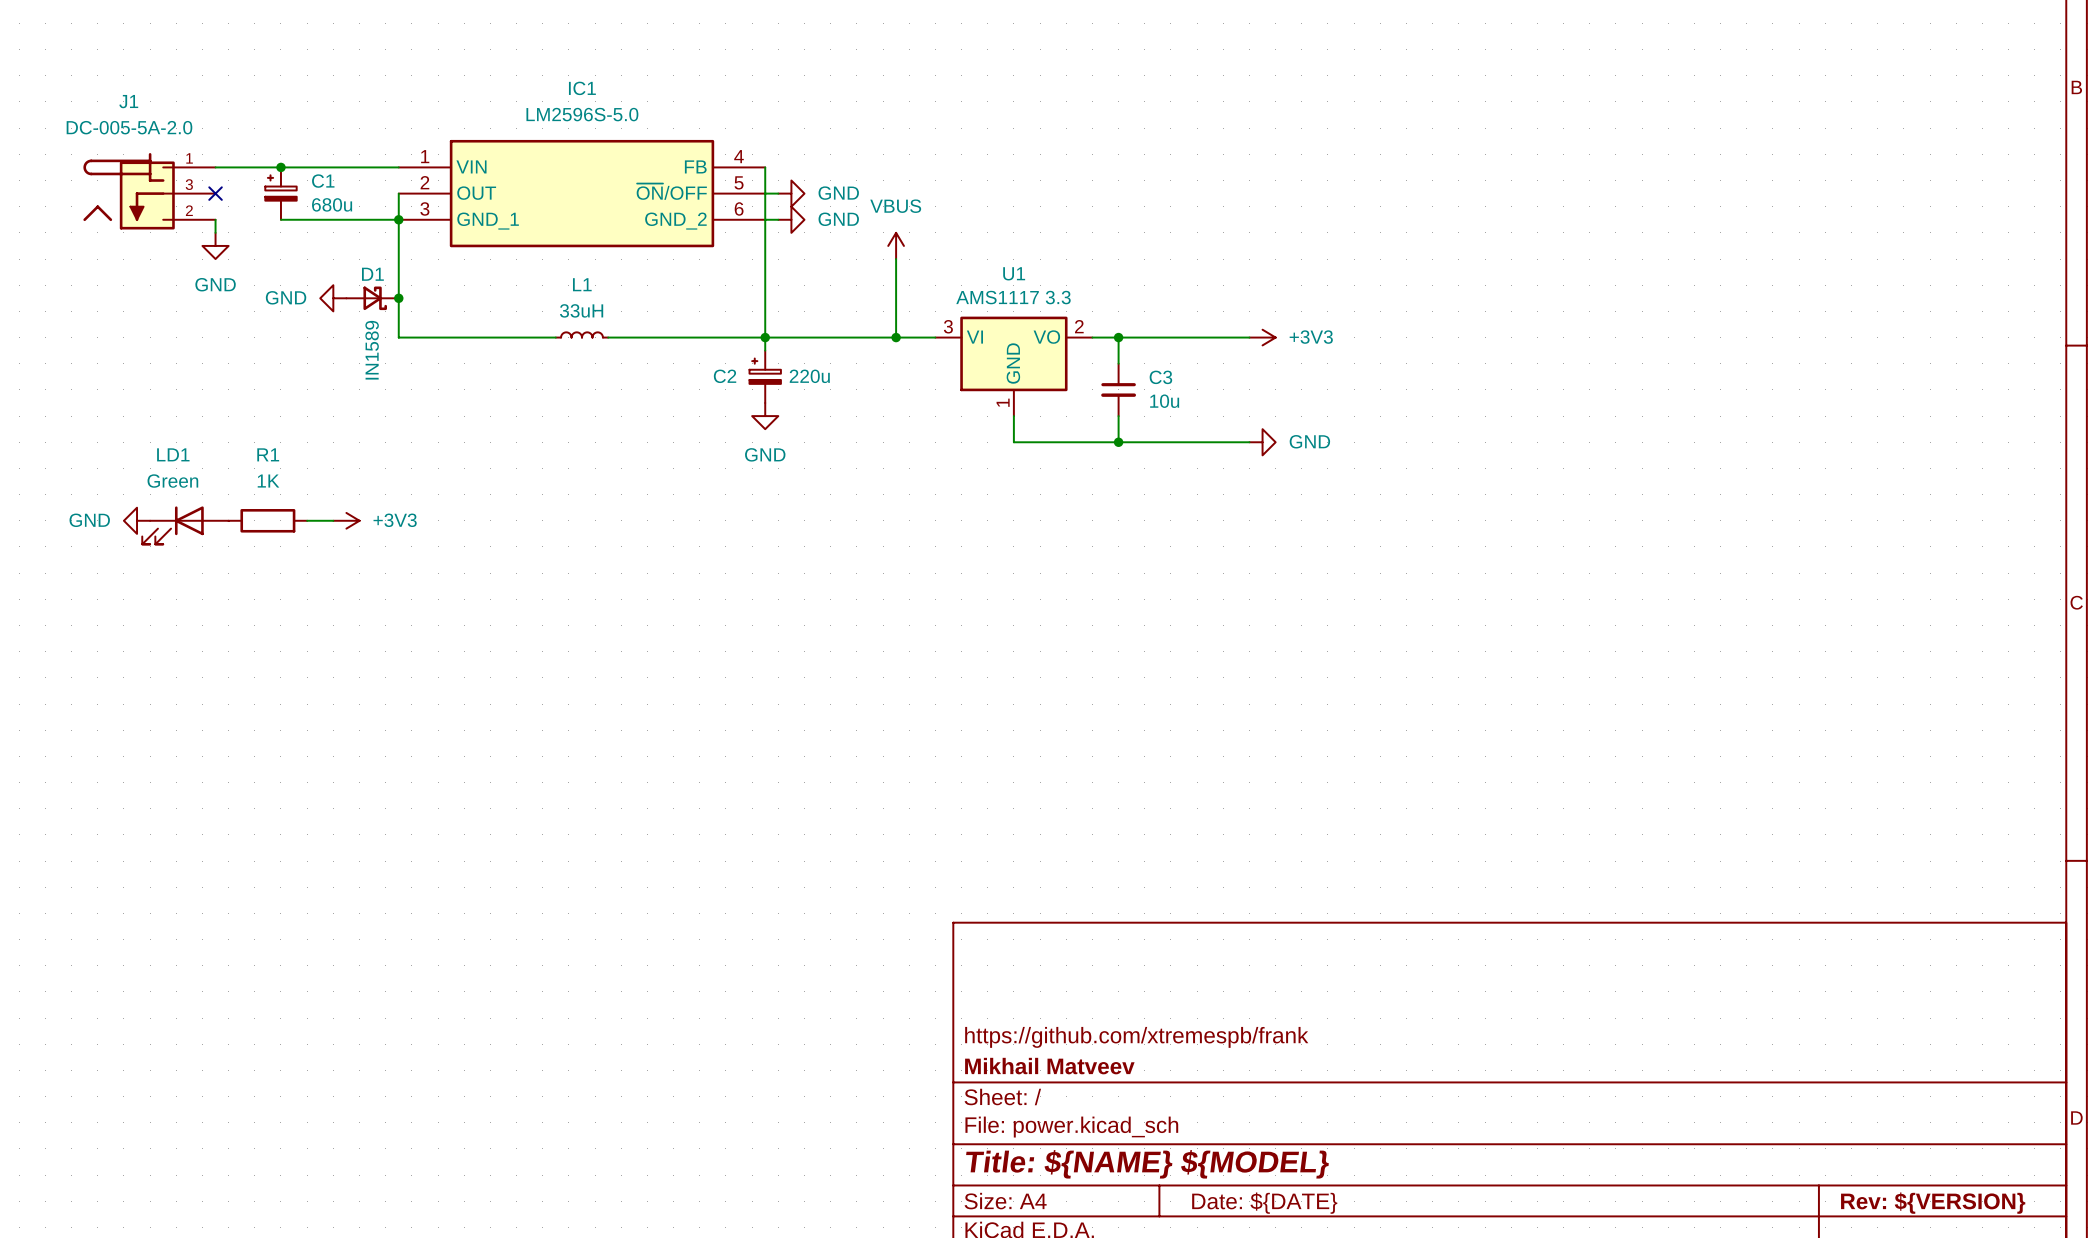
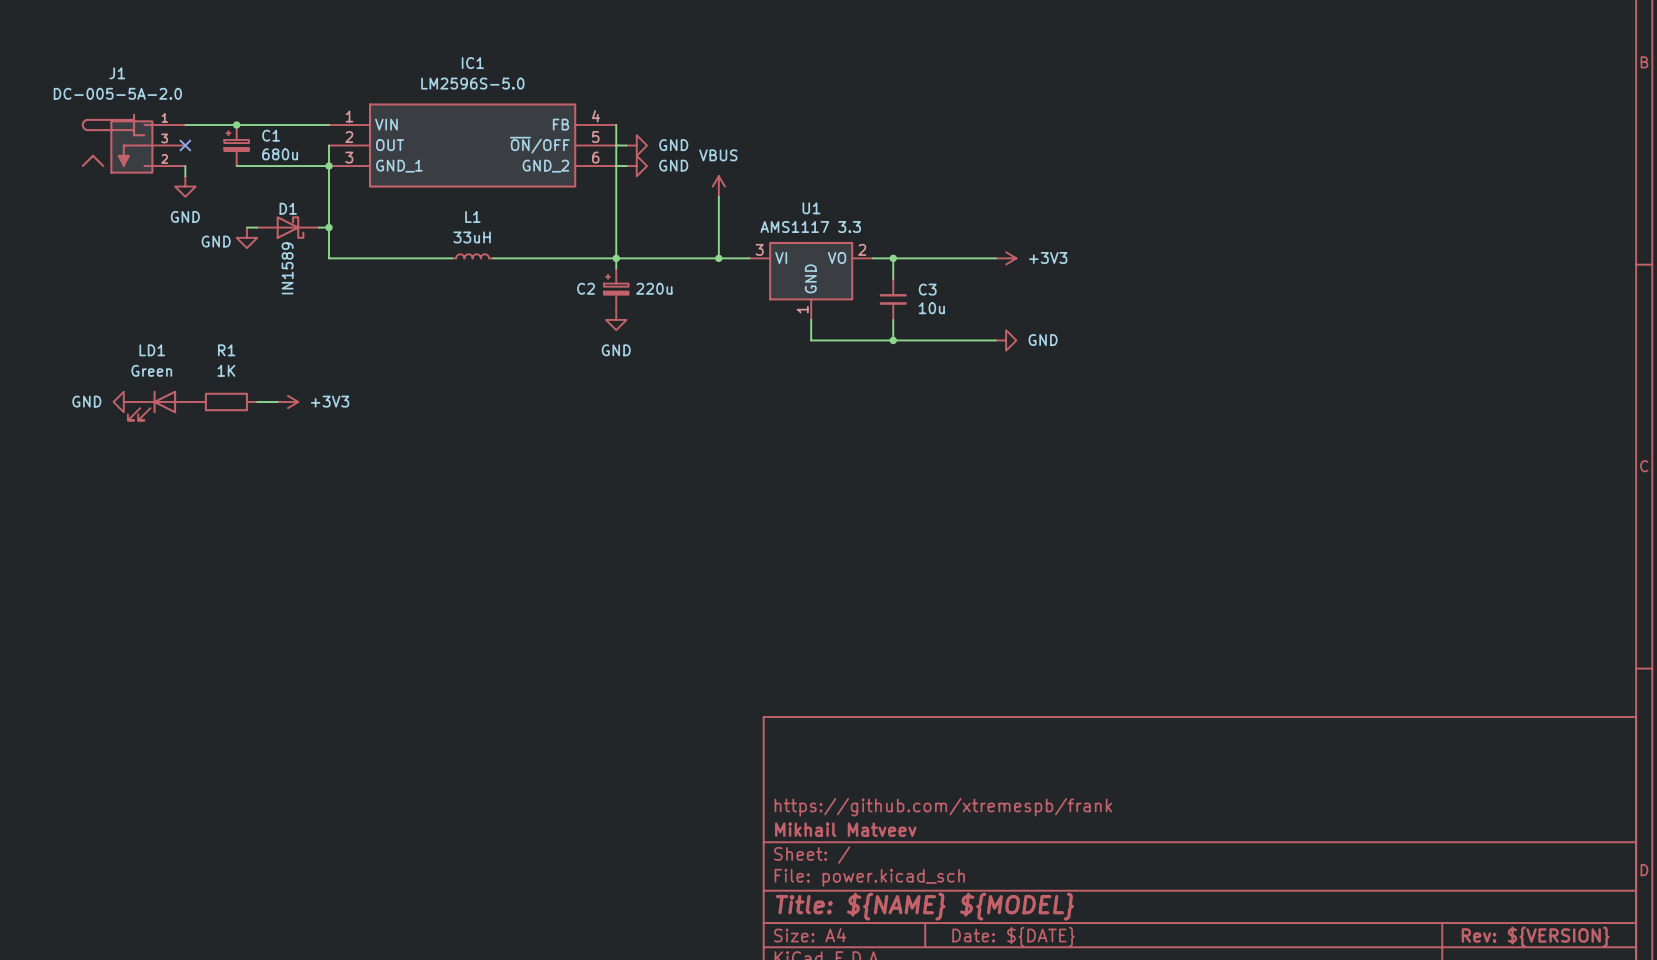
D1 symbol: [346, 286, 399, 311] -> [257, 216, 319, 239]
wire: none -> (246, 227) (257, 227)
power symbol rotation: 0° (333, 298) -> 90° counterclockwise (246, 237)
power symbol position: GND (333, 298) -> GND (246, 237)

